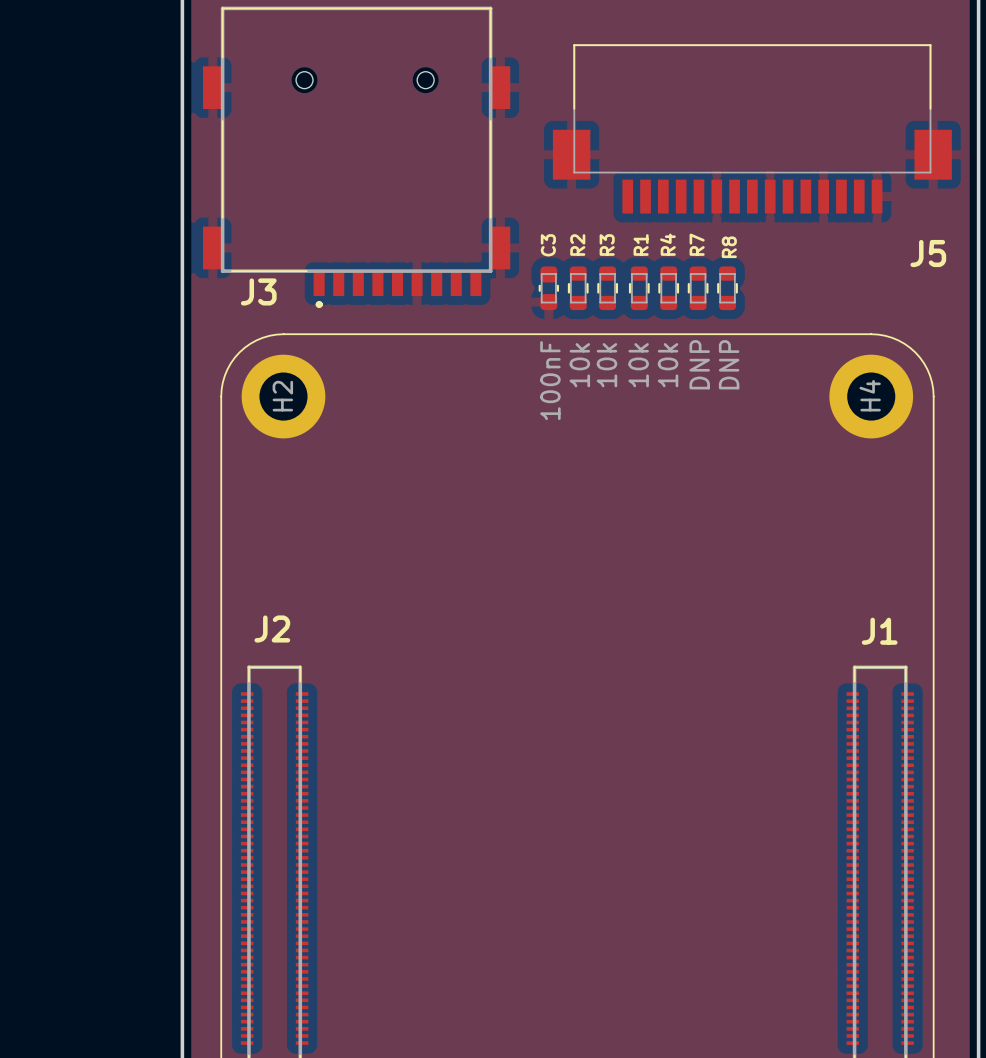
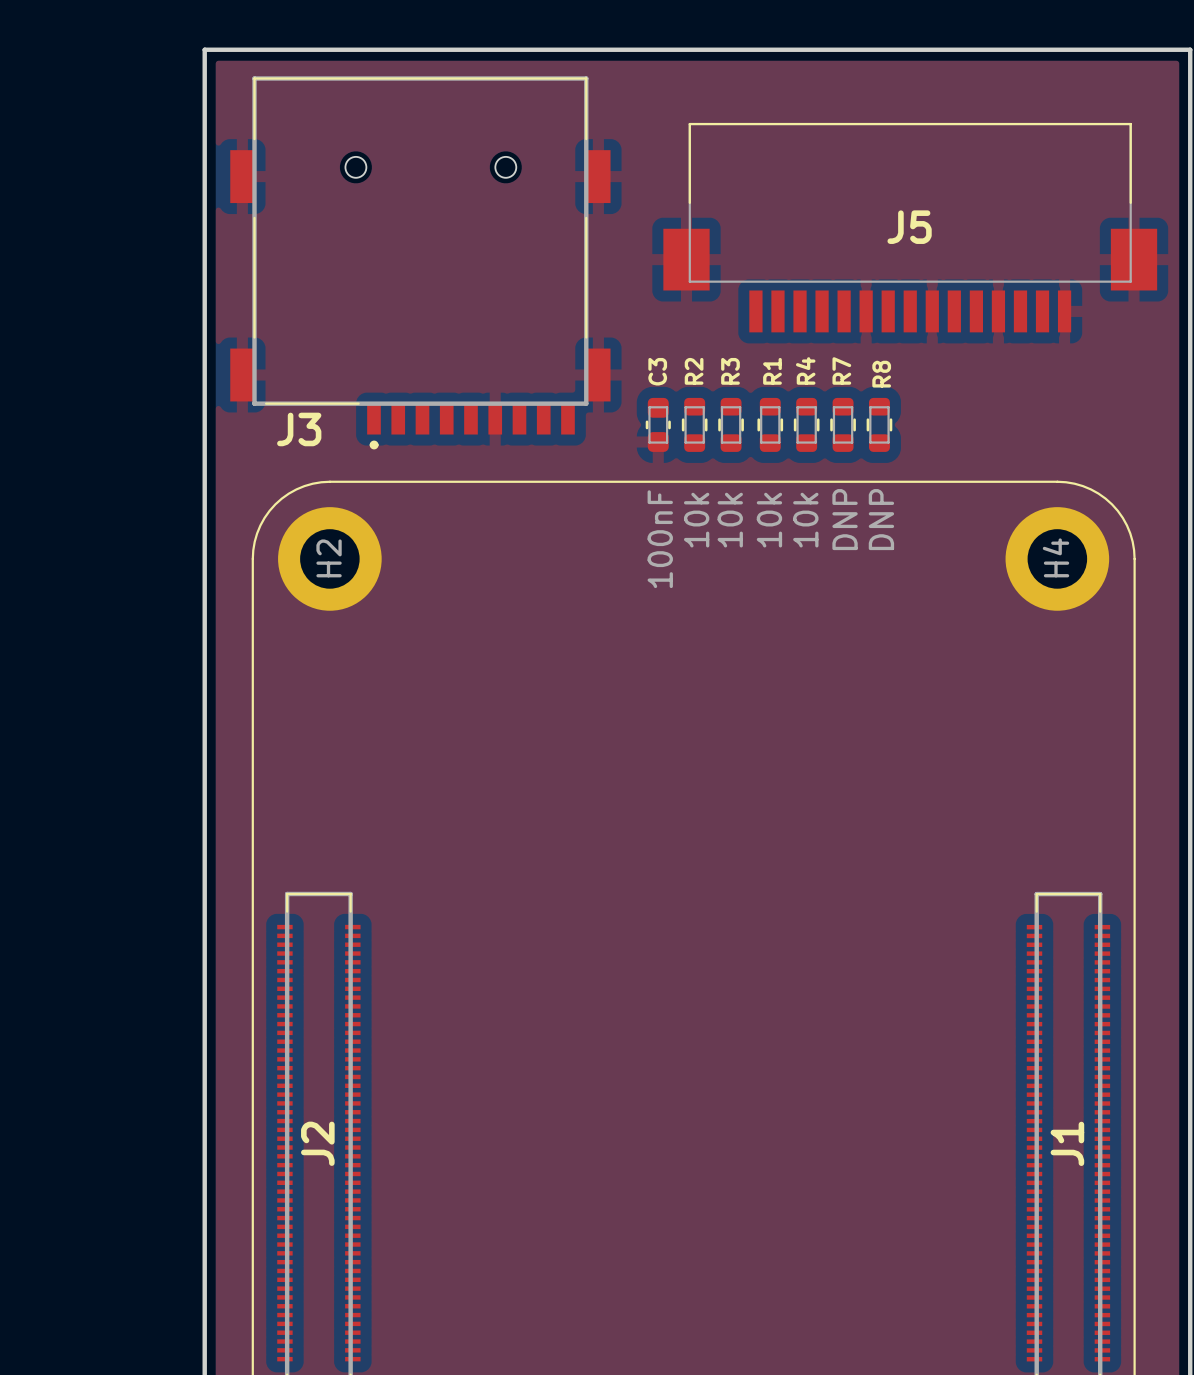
J5 name position: J5 (928, 253) -> J5 (909, 227)
J2 name rotation: 0° (272, 628) -> 90° counterclockwise (317, 1143)
J2 name position: J2 (272, 628) -> J2 (317, 1143)
J1 name rotation: 0° (879, 631) -> 90° counterclockwise (1067, 1143)
J1 name position: J1 (879, 631) -> J1 (1067, 1143)

